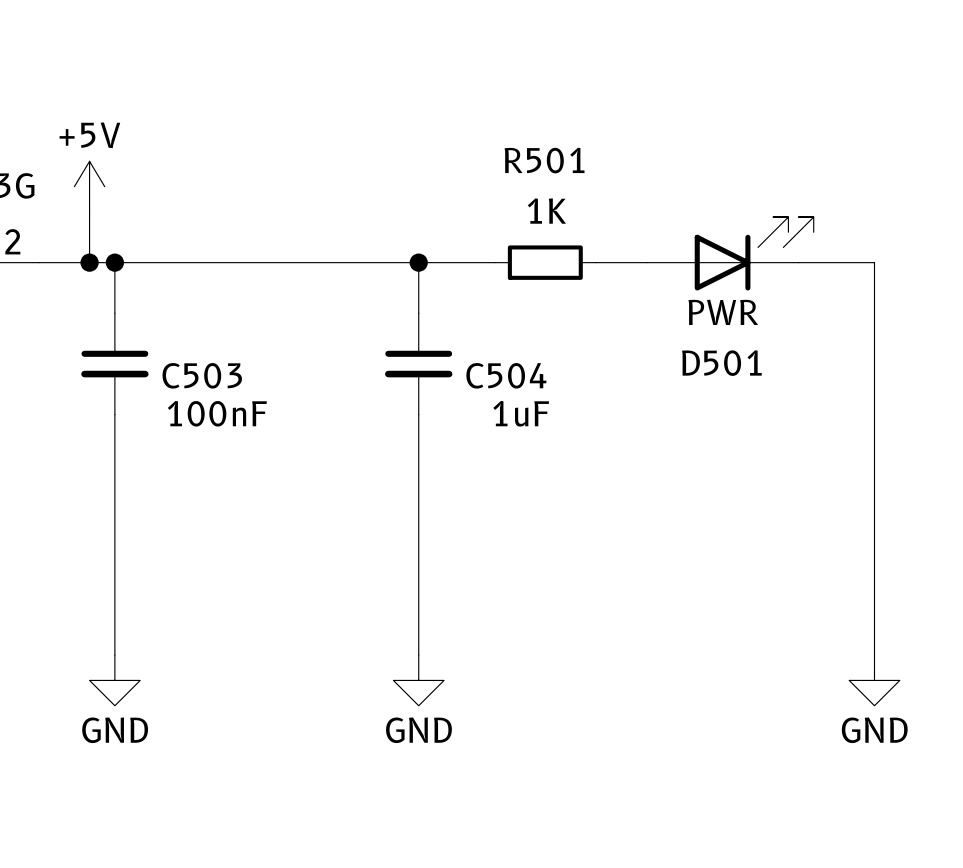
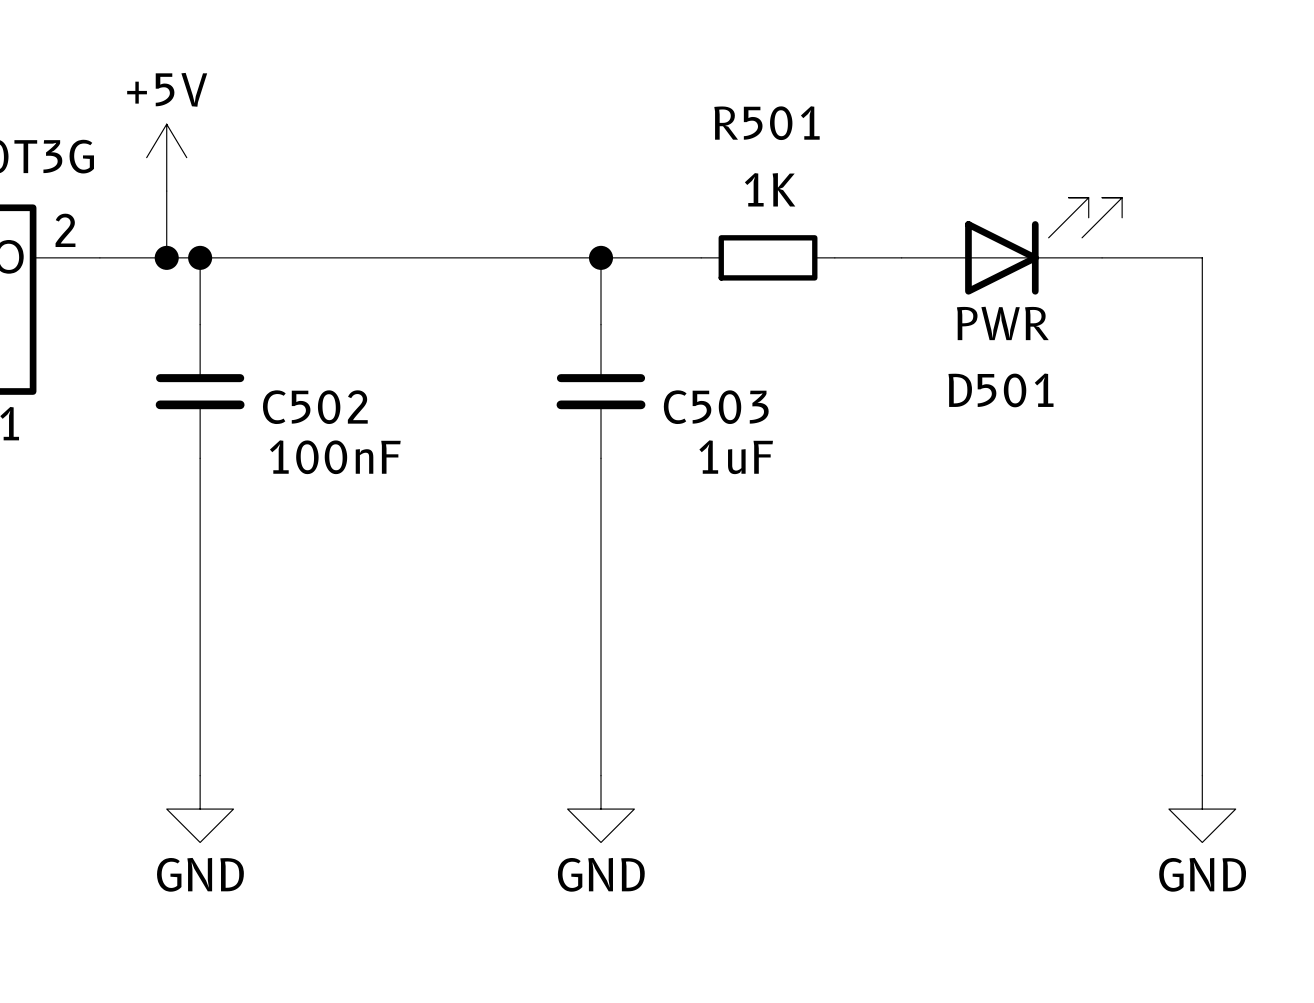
C503 name: C503 (202, 375) -> C502 (315, 407)
C504 name: C504 (506, 375) -> C503 (716, 407)

